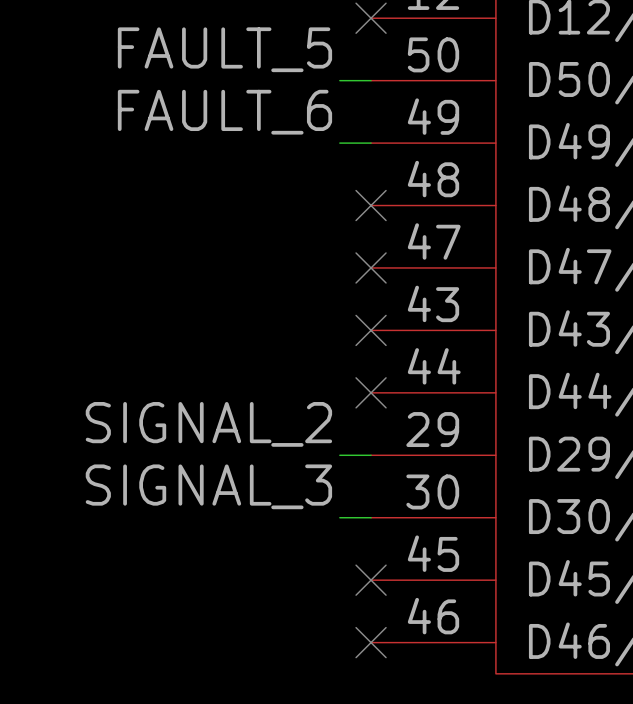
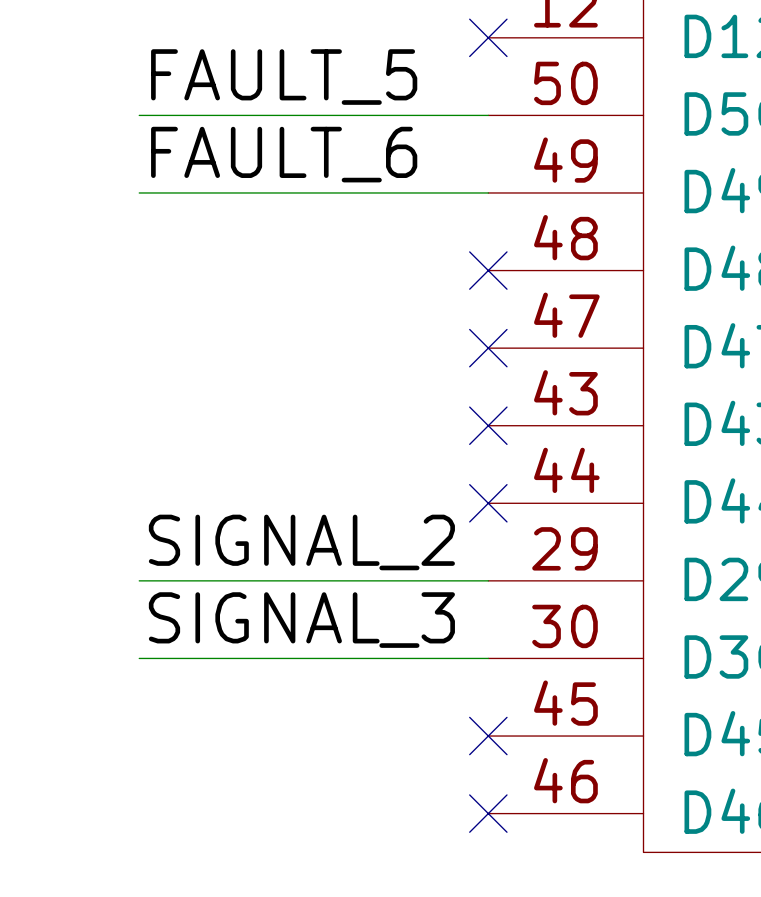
label position: FAULT_5 (224, 49) -> FAULT_5 (284, 77)
wire: none -> (139, 115) (449, 115)
label position: FAULT_6 (224, 112) -> FAULT_6 (284, 154)
wire: none -> (139, 192) (449, 192)
label position: SIGNAL_2 (208, 424) -> SIGNAL_2 (301, 542)
wire: none -> (139, 580) (449, 580)
label position: SIGNAL_3 (208, 486) -> SIGNAL_3 (301, 620)
wire: none -> (139, 658) (449, 658)

